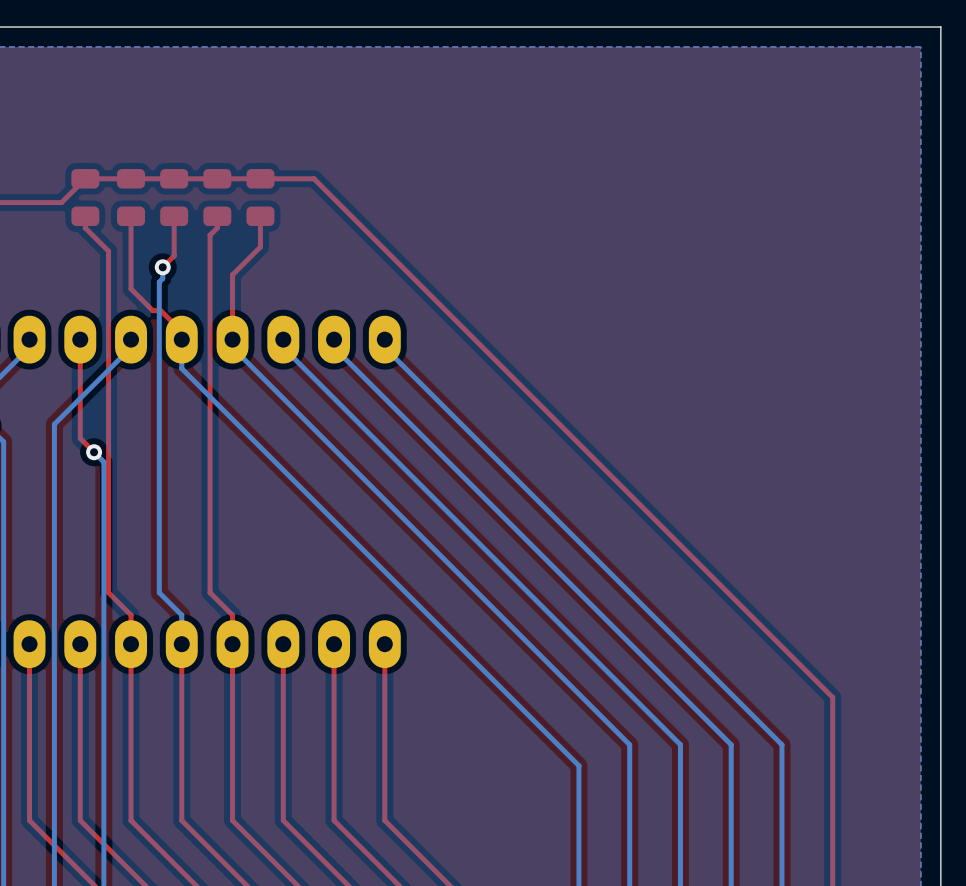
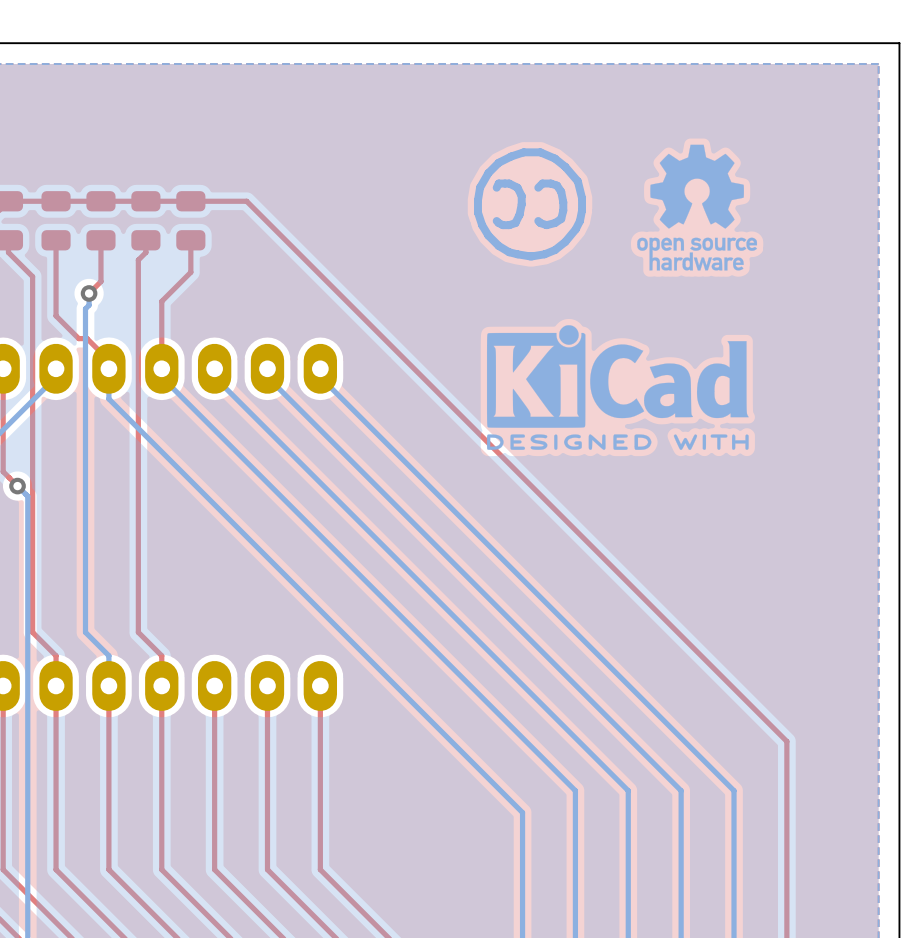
drawing: none -> [637, 144, 758, 271]
drawing: none -> [474, 148, 586, 261]
drawing: none -> [486, 325, 749, 450]

